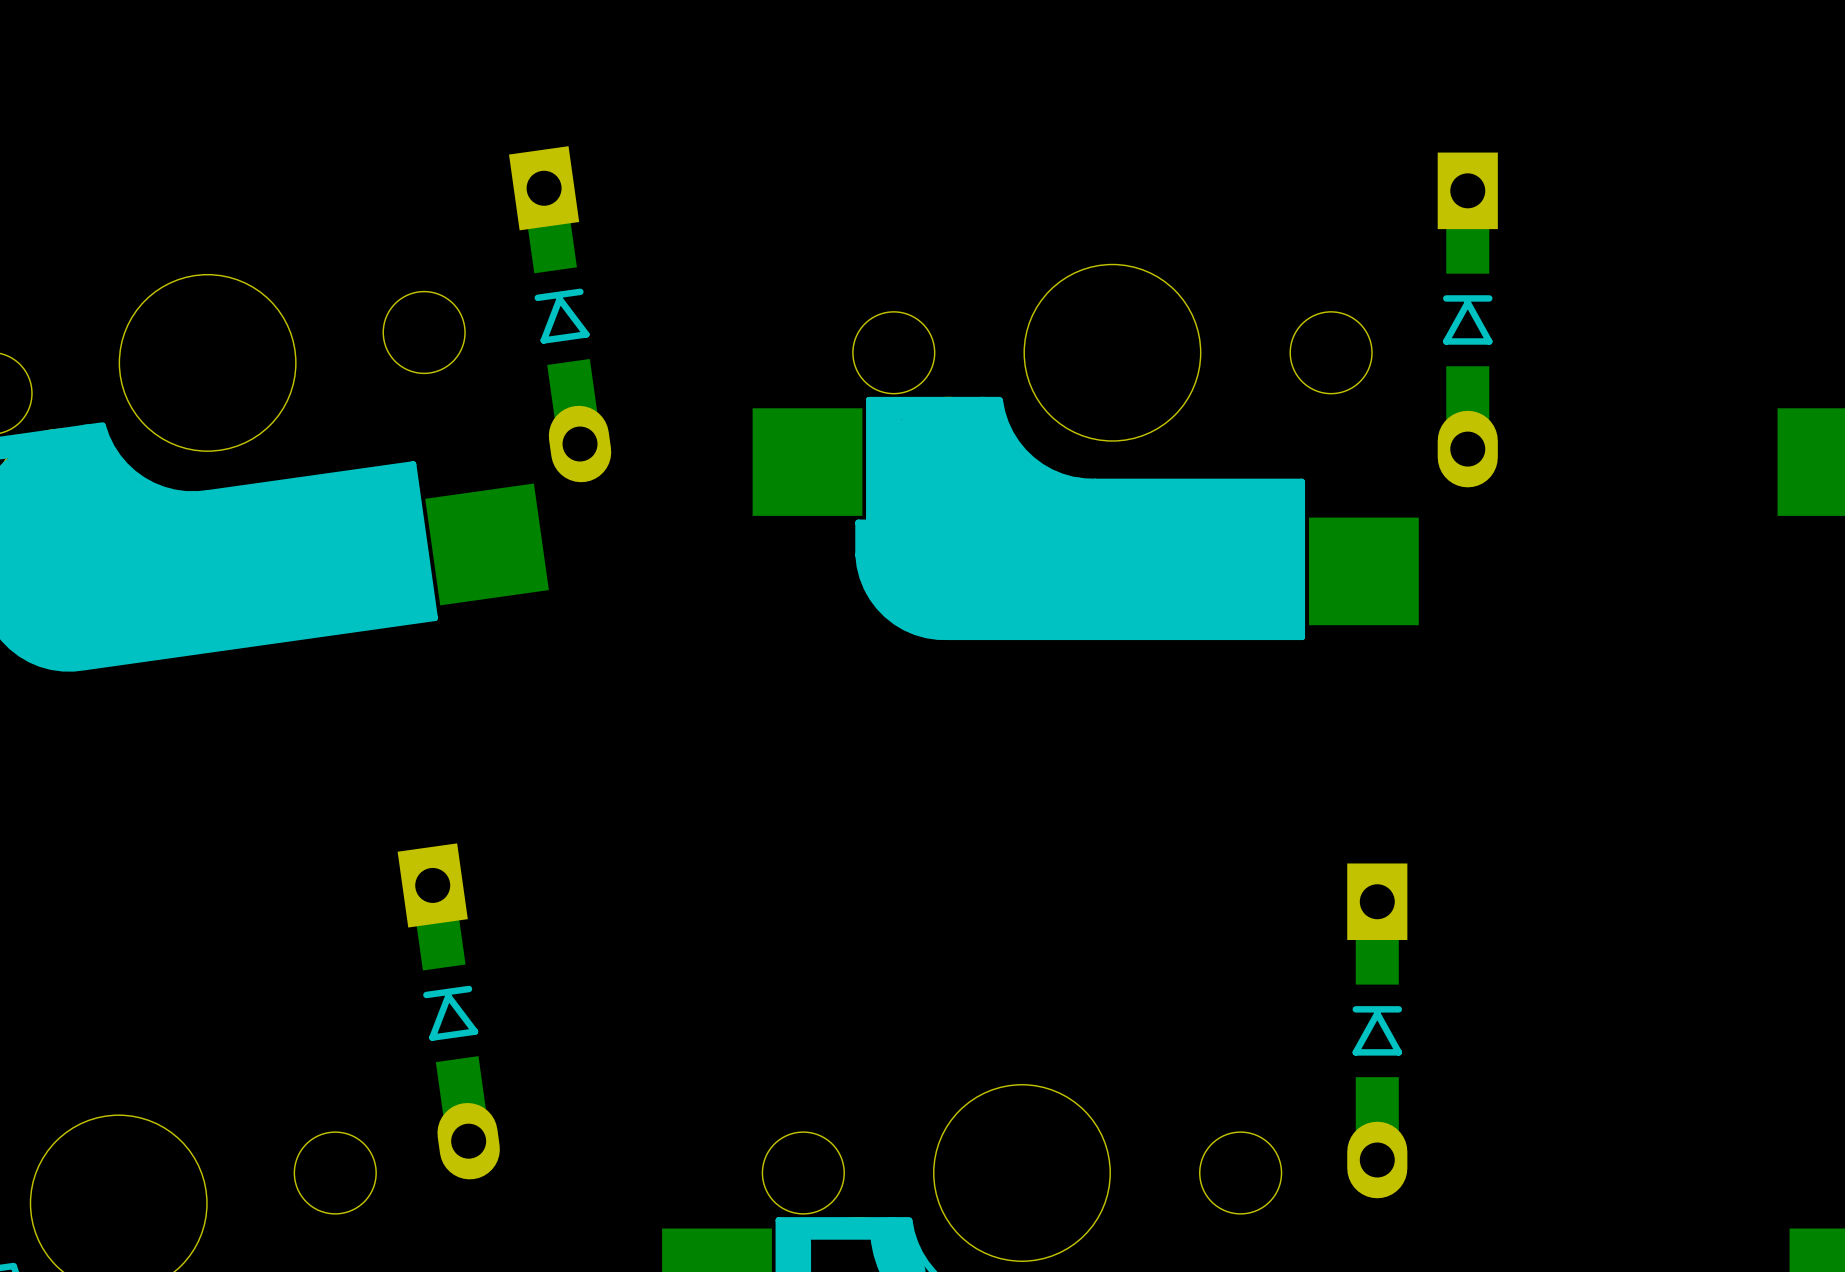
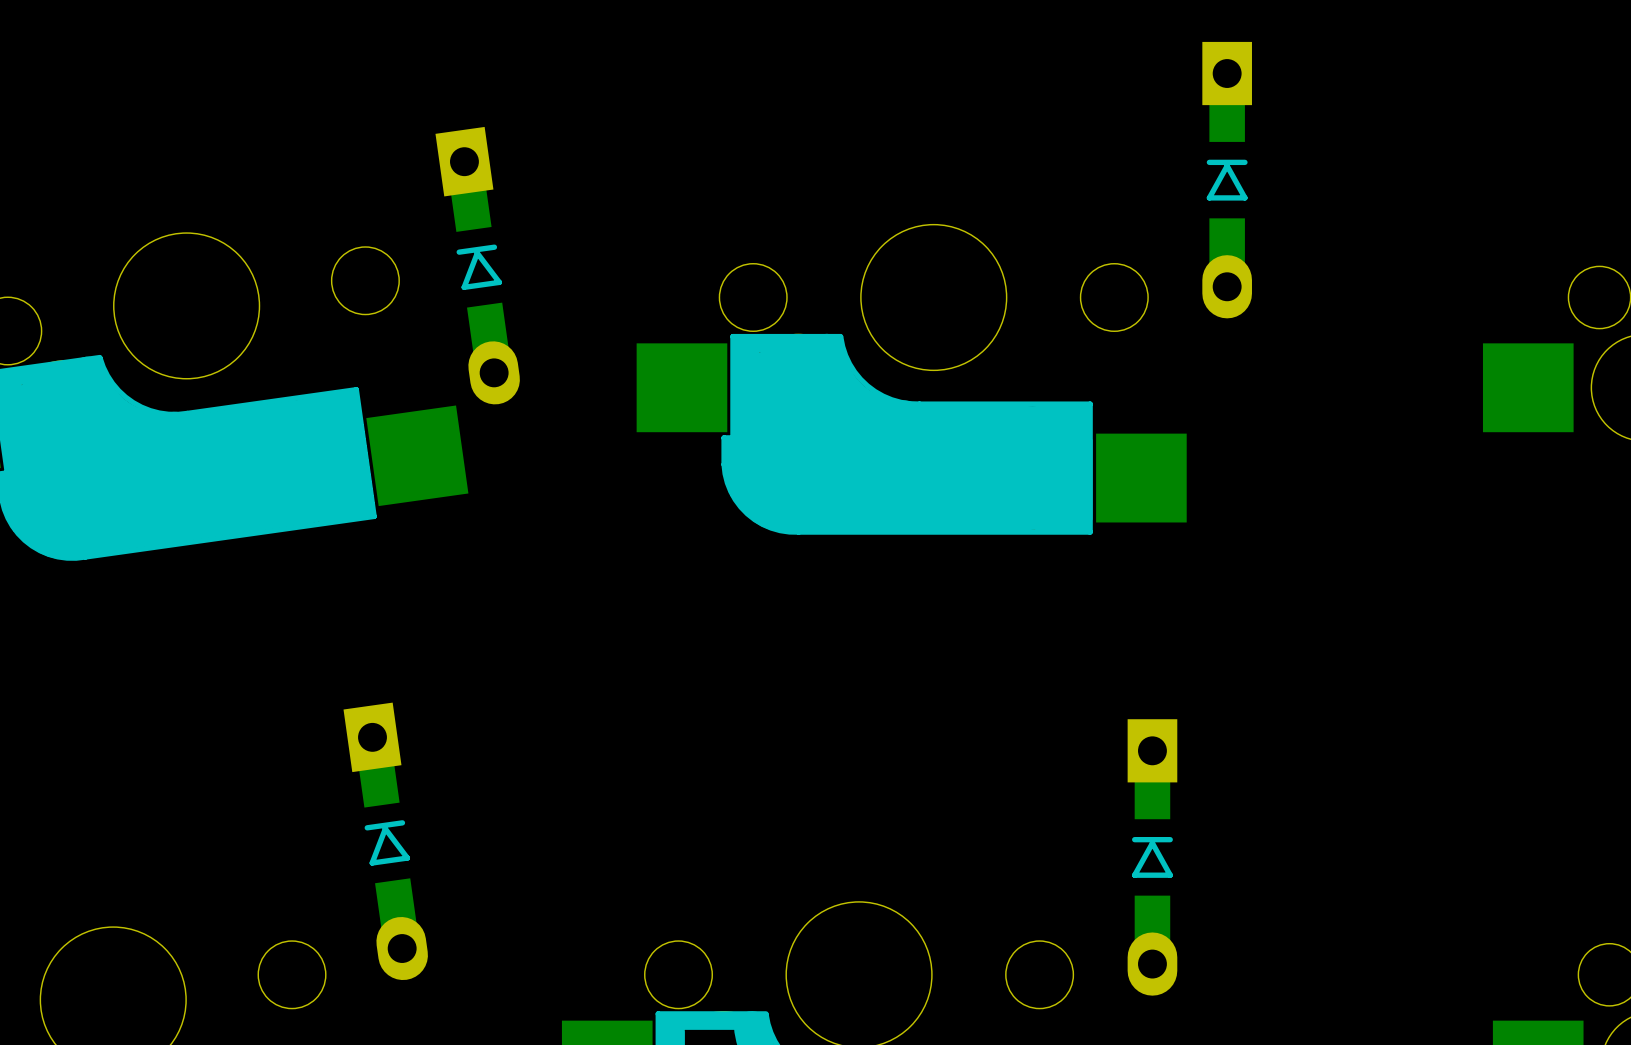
part position: (1467, 319) -> (1227, 180)

